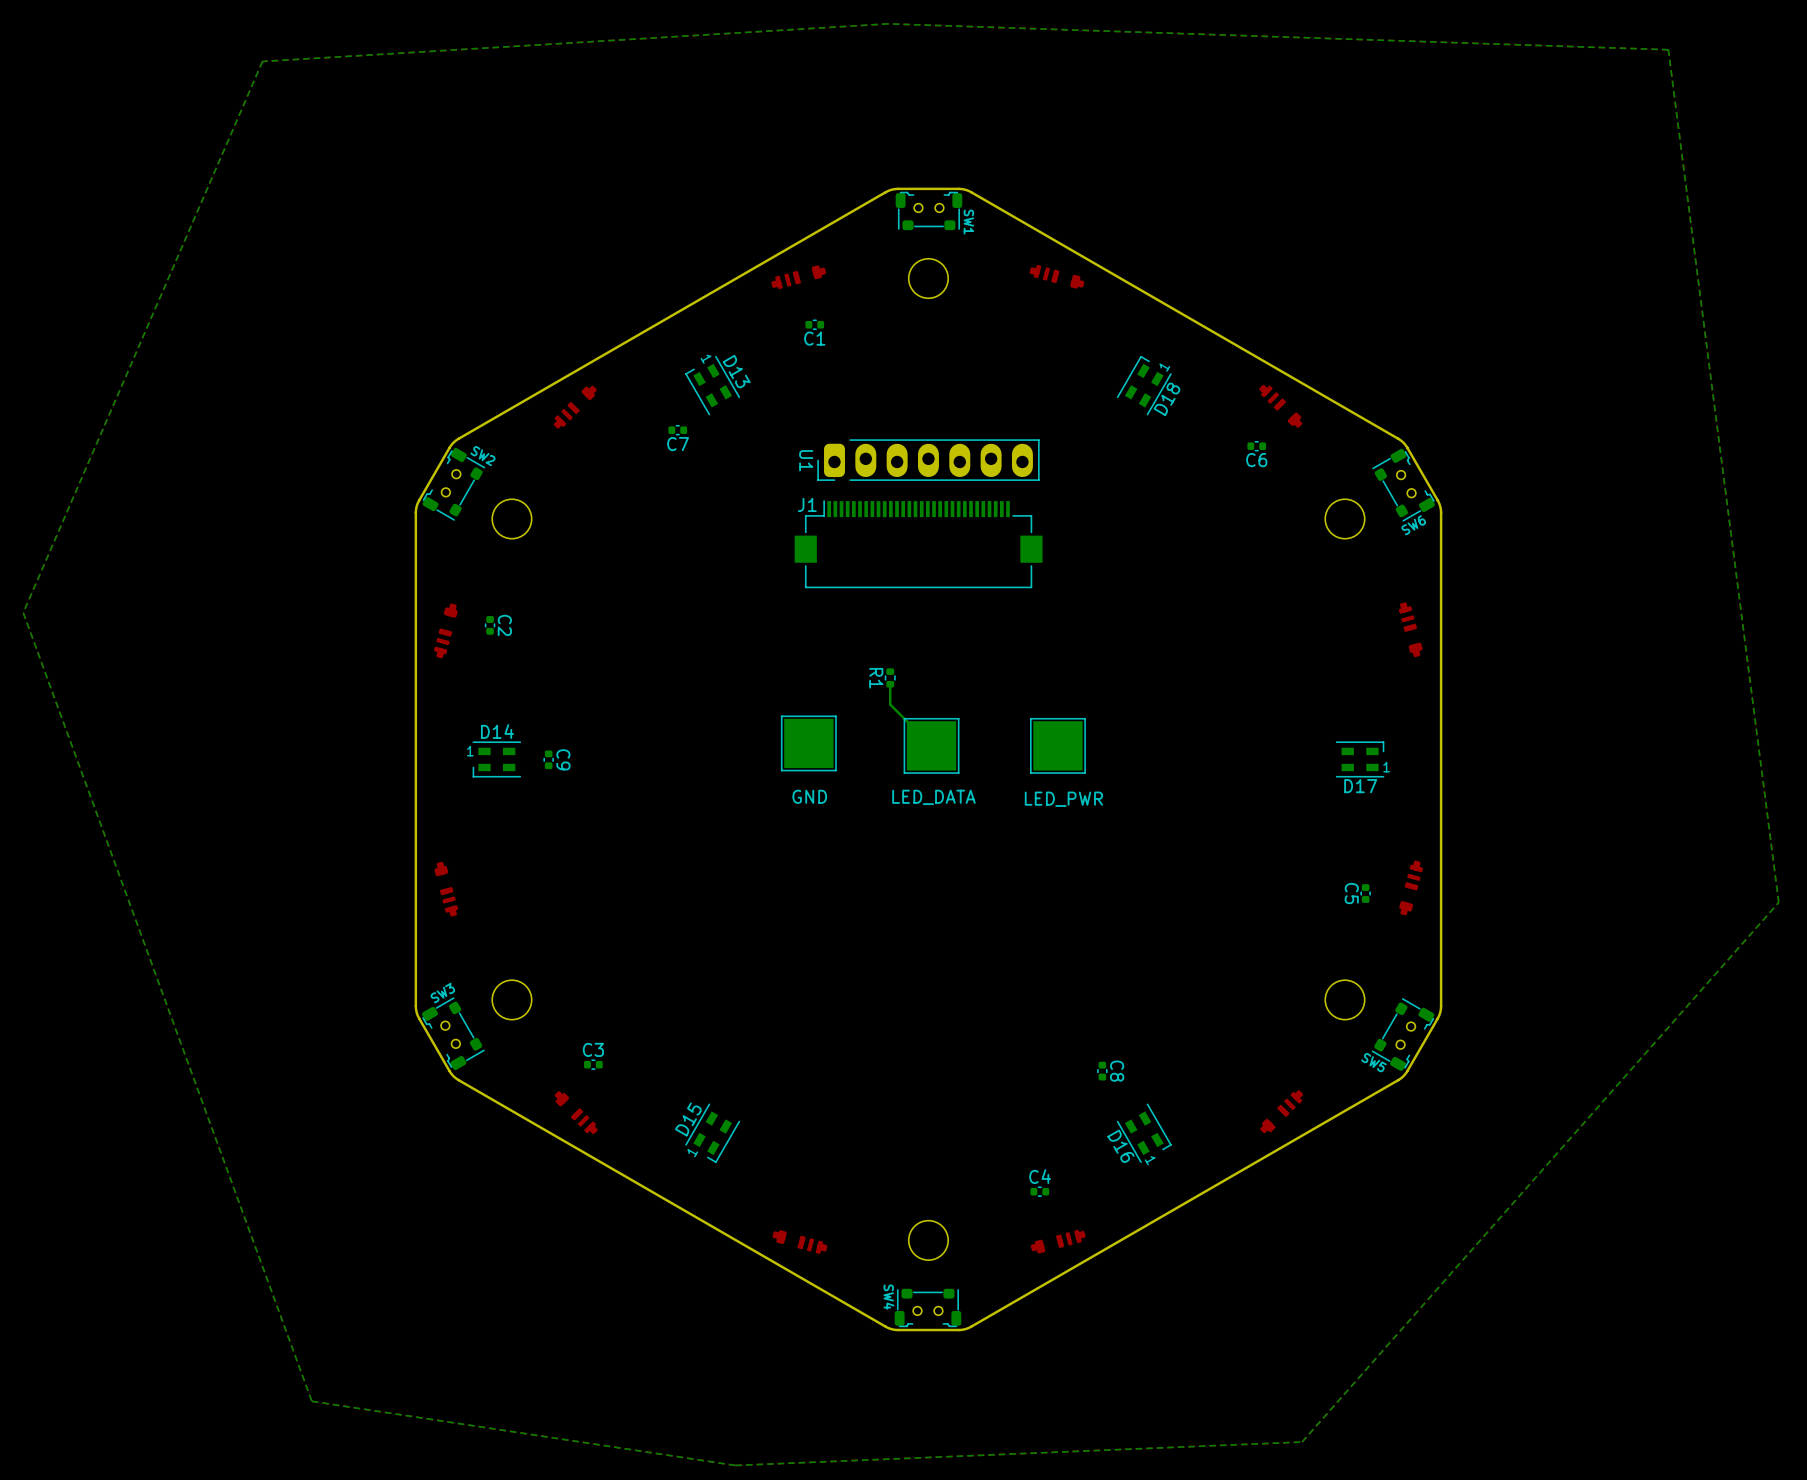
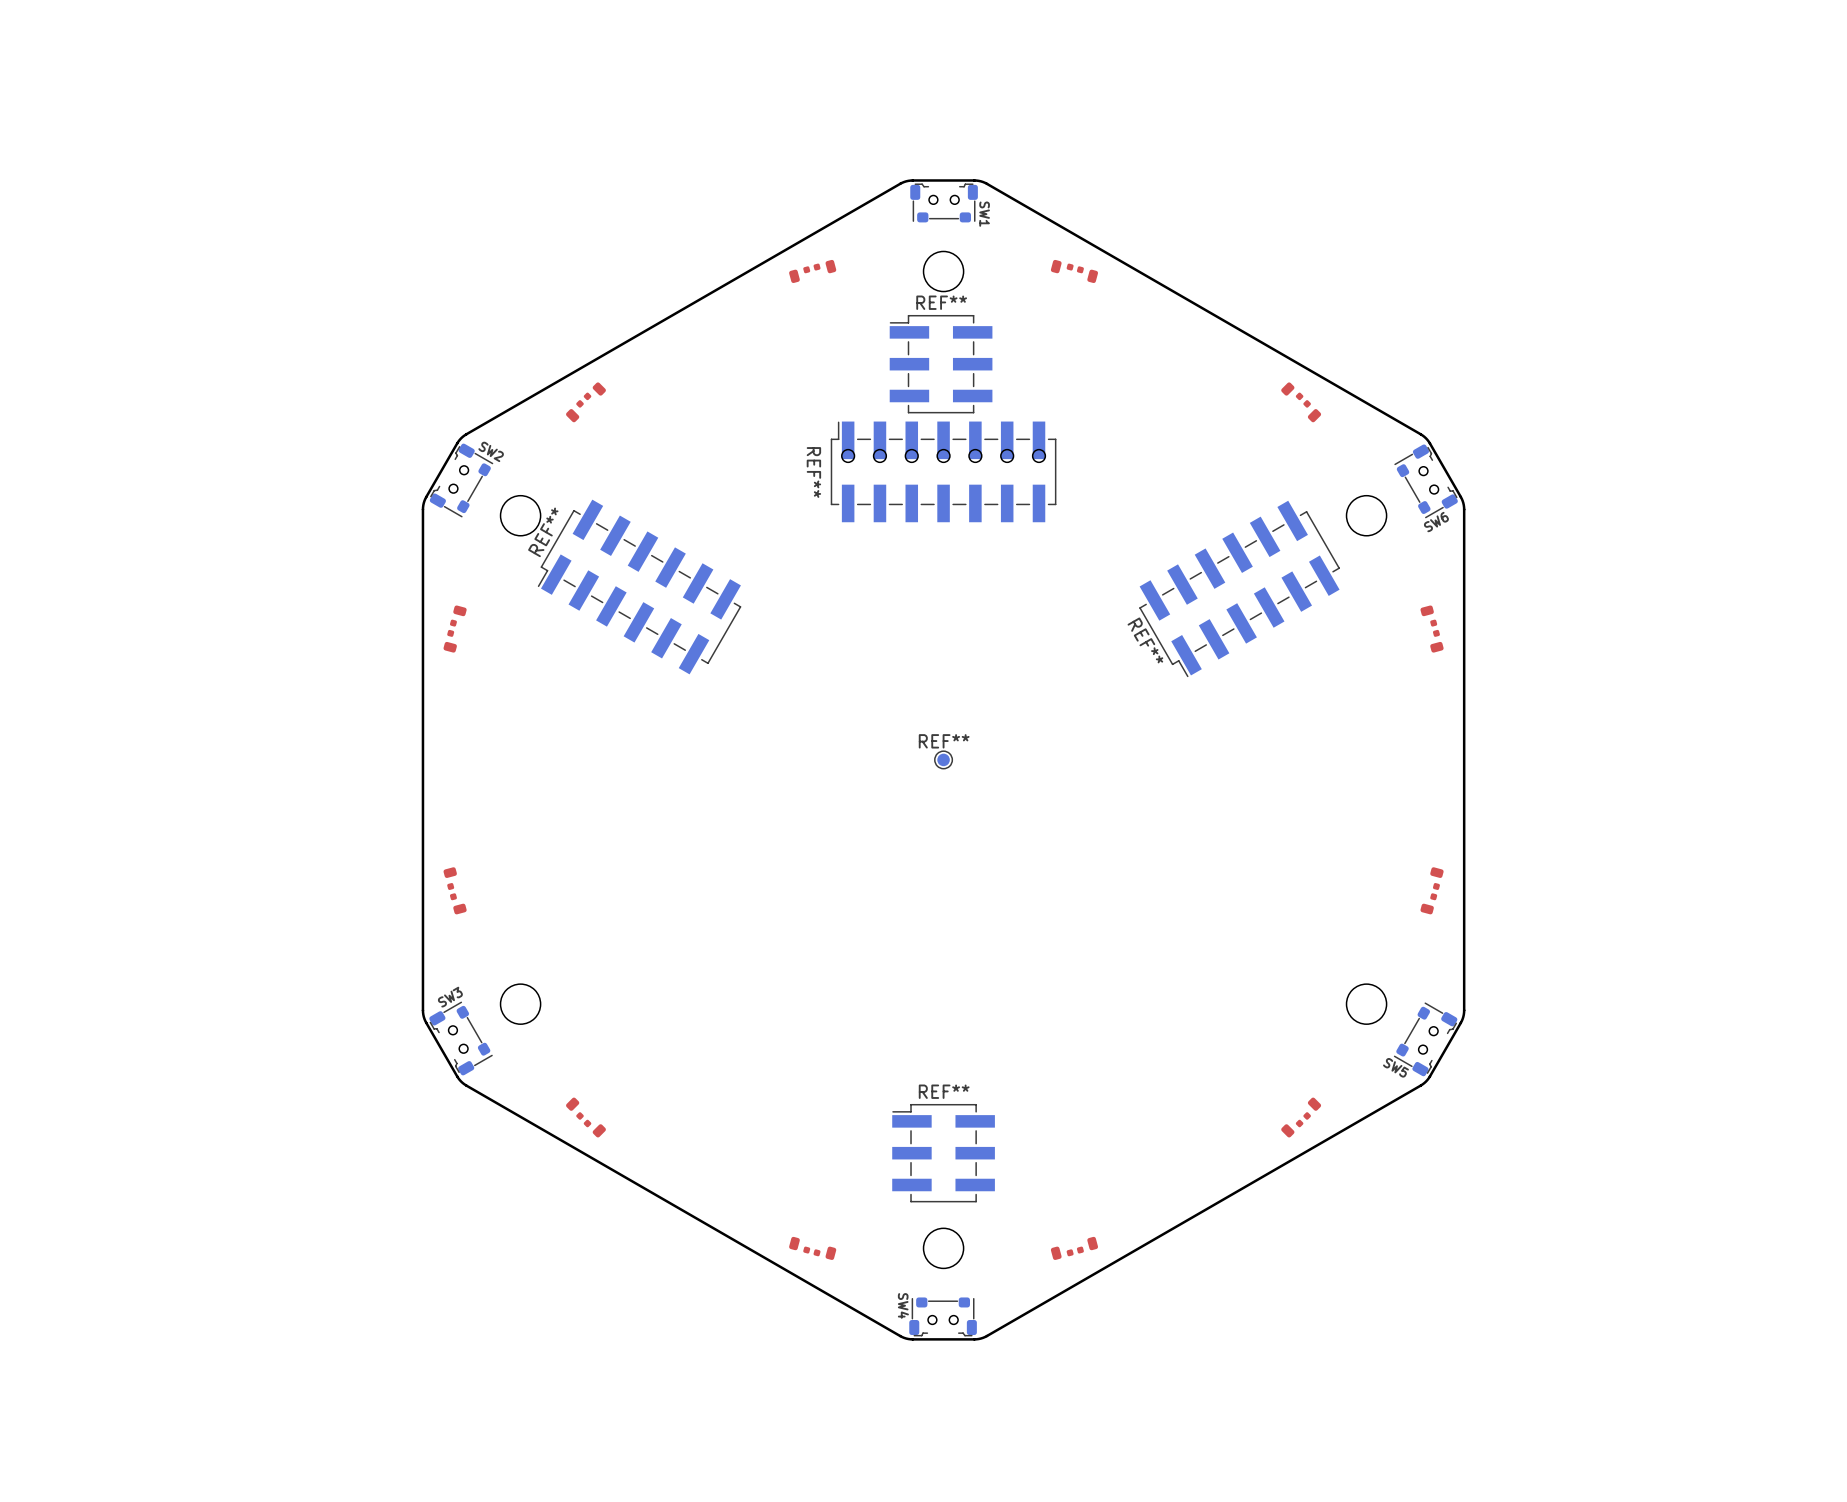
bottom zone outline: (888, 23) (262, 61) (23, 612) (311, 1401) (735, 1465) (1302, 1442) (1778, 902) (1668, 49) (888, 23) -> none
part footprint: [1029, 264, 1085, 289] -> [1050, 259, 1099, 284]
part footprint: [771, 265, 827, 290] -> [789, 259, 837, 284]
C1: (814, 324) -> none
REF**: none -> (941, 364)
part footprint: [1259, 384, 1303, 428] -> [1281, 382, 1322, 423]
part footprint: [553, 385, 597, 429] -> [566, 382, 606, 423]
D13: (712, 385) -> none
D18: (1144, 385) -> none
C7: (677, 430) -> none
C6: (1256, 446) -> none
U1: (928, 460) -> none
REF**: none -> (943, 471)
J1: (918, 544) -> none
REF**: none -> (639, 587)
REF**: none -> (1239, 588)
part footprint: [1398, 602, 1423, 658] -> [1420, 605, 1444, 653]
part footprint: [433, 603, 458, 659] -> [443, 605, 467, 653]
C2: (490, 625) -> none
R1: (890, 677) -> none
bottom track: (890, 684) (890, 704) (931, 745) -> none
part: (808, 743) -> none
part: (931, 745) -> none
part: (1057, 745) -> none
D14: (496, 759) -> none
C9: (548, 759) -> none
REF**: none -> (943, 759)
D17: (1360, 759) -> none
text: GND (809, 796) -> none
text: LED_DATA (933, 797) -> none
text: LED_PWR (1063, 799) -> none
part footprint: [1399, 860, 1423, 916] -> [1420, 867, 1444, 915]
part footprint: [434, 861, 459, 917] -> [443, 867, 467, 915]
C5: (1365, 893) -> none
C3: (593, 1064) -> none
C8: (1102, 1071) -> none
part footprint: [1260, 1090, 1304, 1134] -> [1281, 1097, 1322, 1138]
part footprint: [554, 1091, 598, 1135] -> [566, 1097, 606, 1138]
D15: (712, 1133) -> none
D16: (1144, 1133) -> none
REF**: none -> (943, 1153)
C4: (1039, 1191) -> none
part footprint: [1030, 1229, 1086, 1254] -> [1050, 1236, 1099, 1260]
part footprint: [772, 1230, 828, 1254] -> [789, 1236, 837, 1260]

